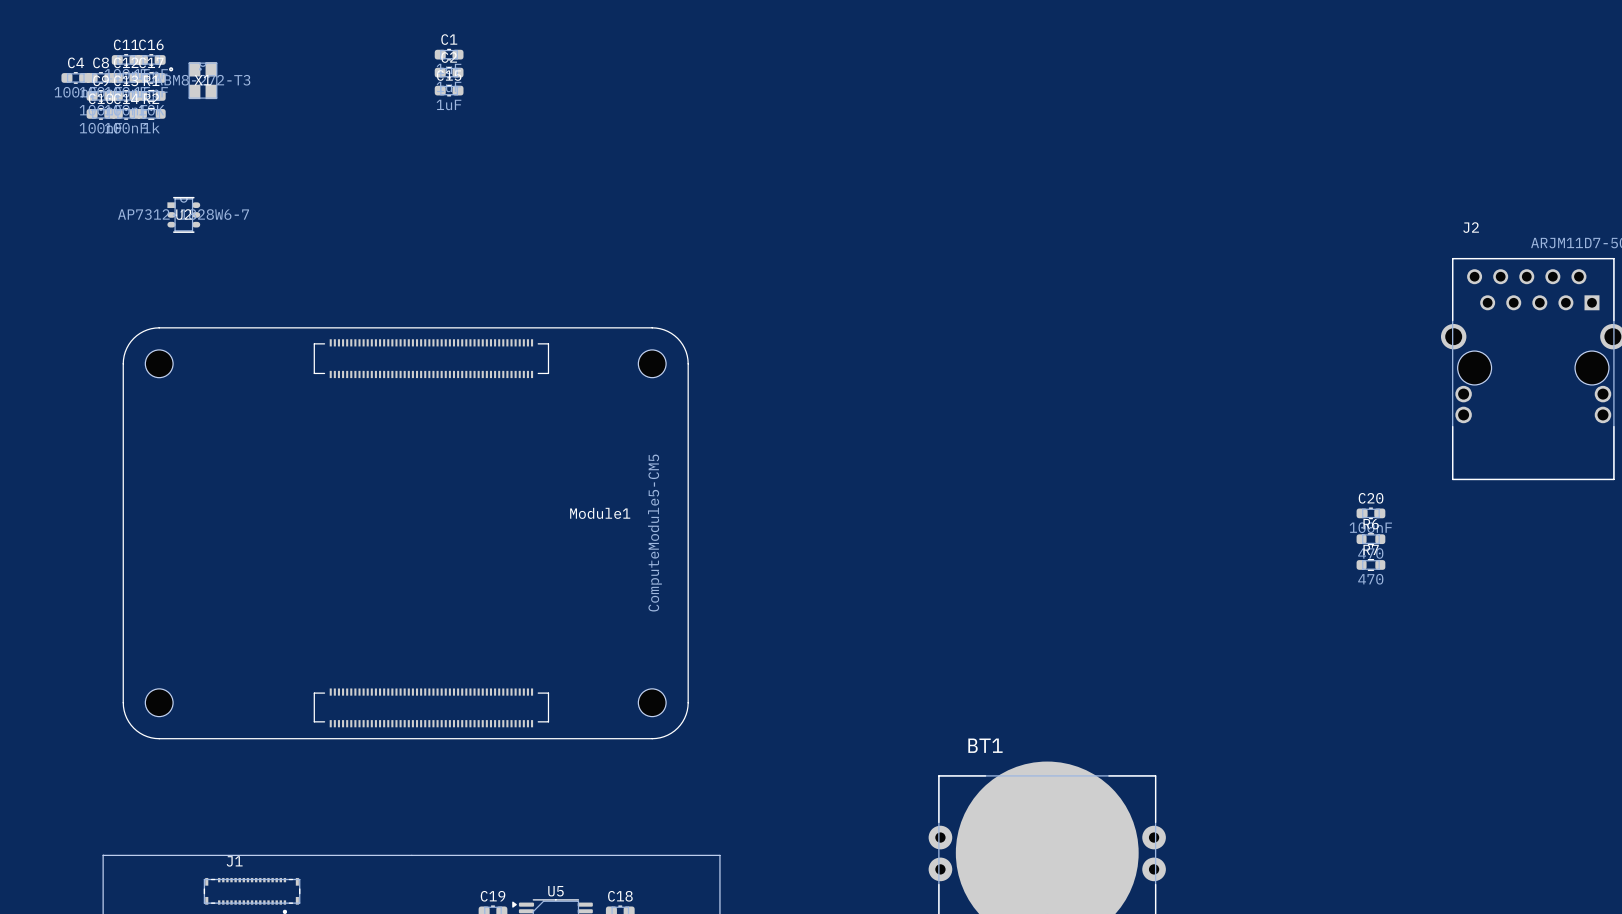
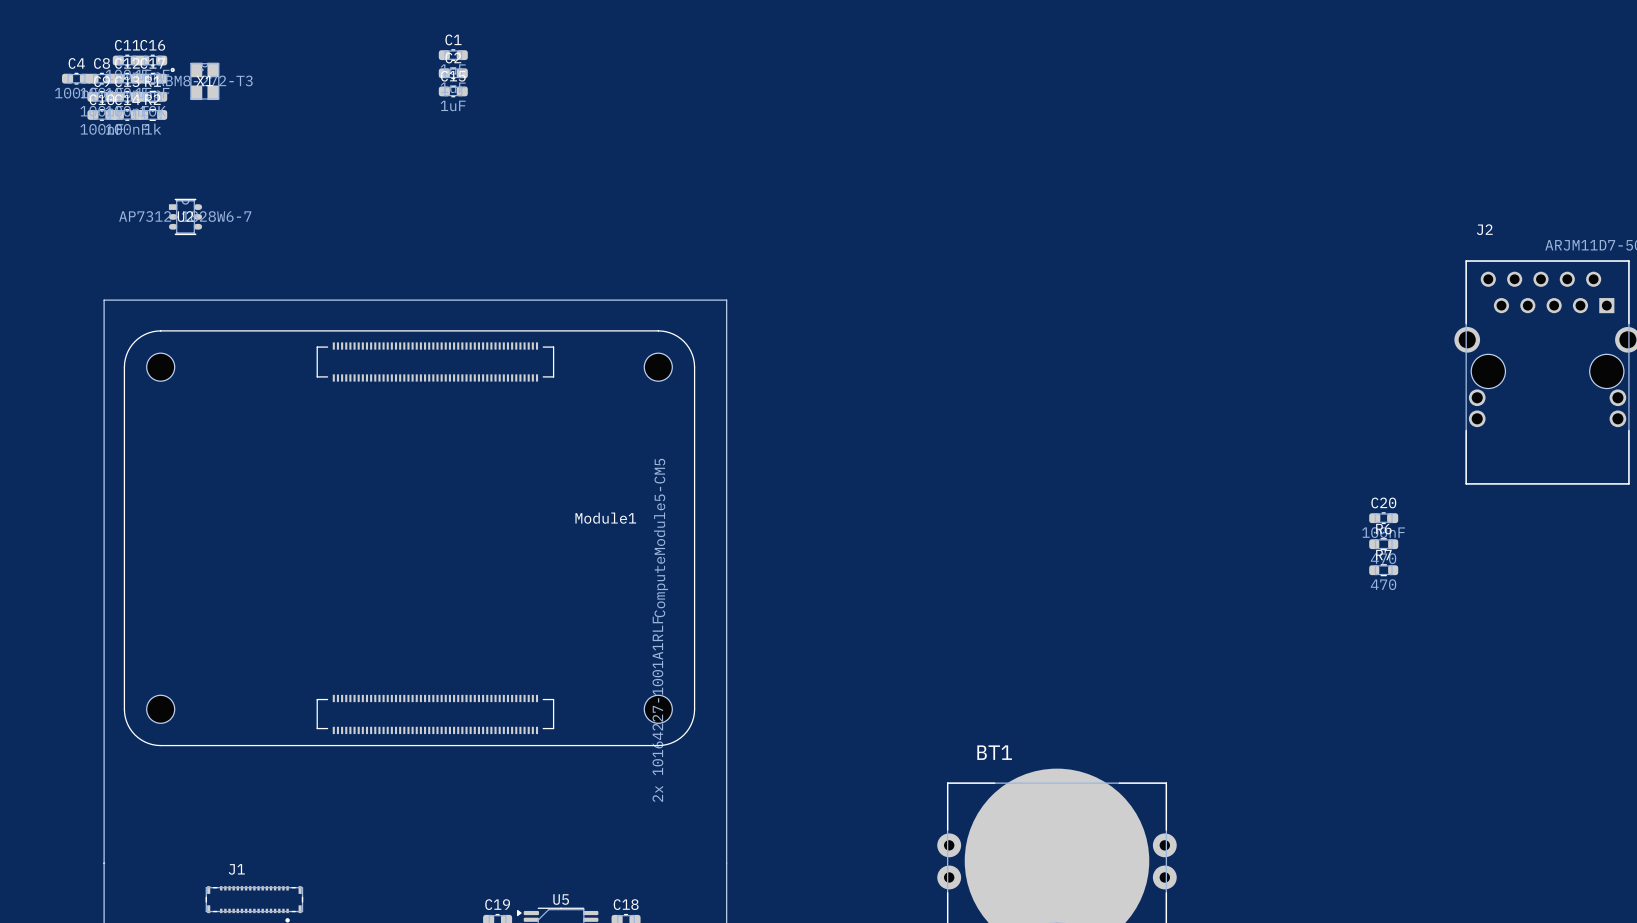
Module1 text: none -> 2x 10164227-1001A1RLF (657, 709)
board edge: (103, 855) (719, 855) -> (104, 863) (104, 300) (726, 300) (726, 863)

